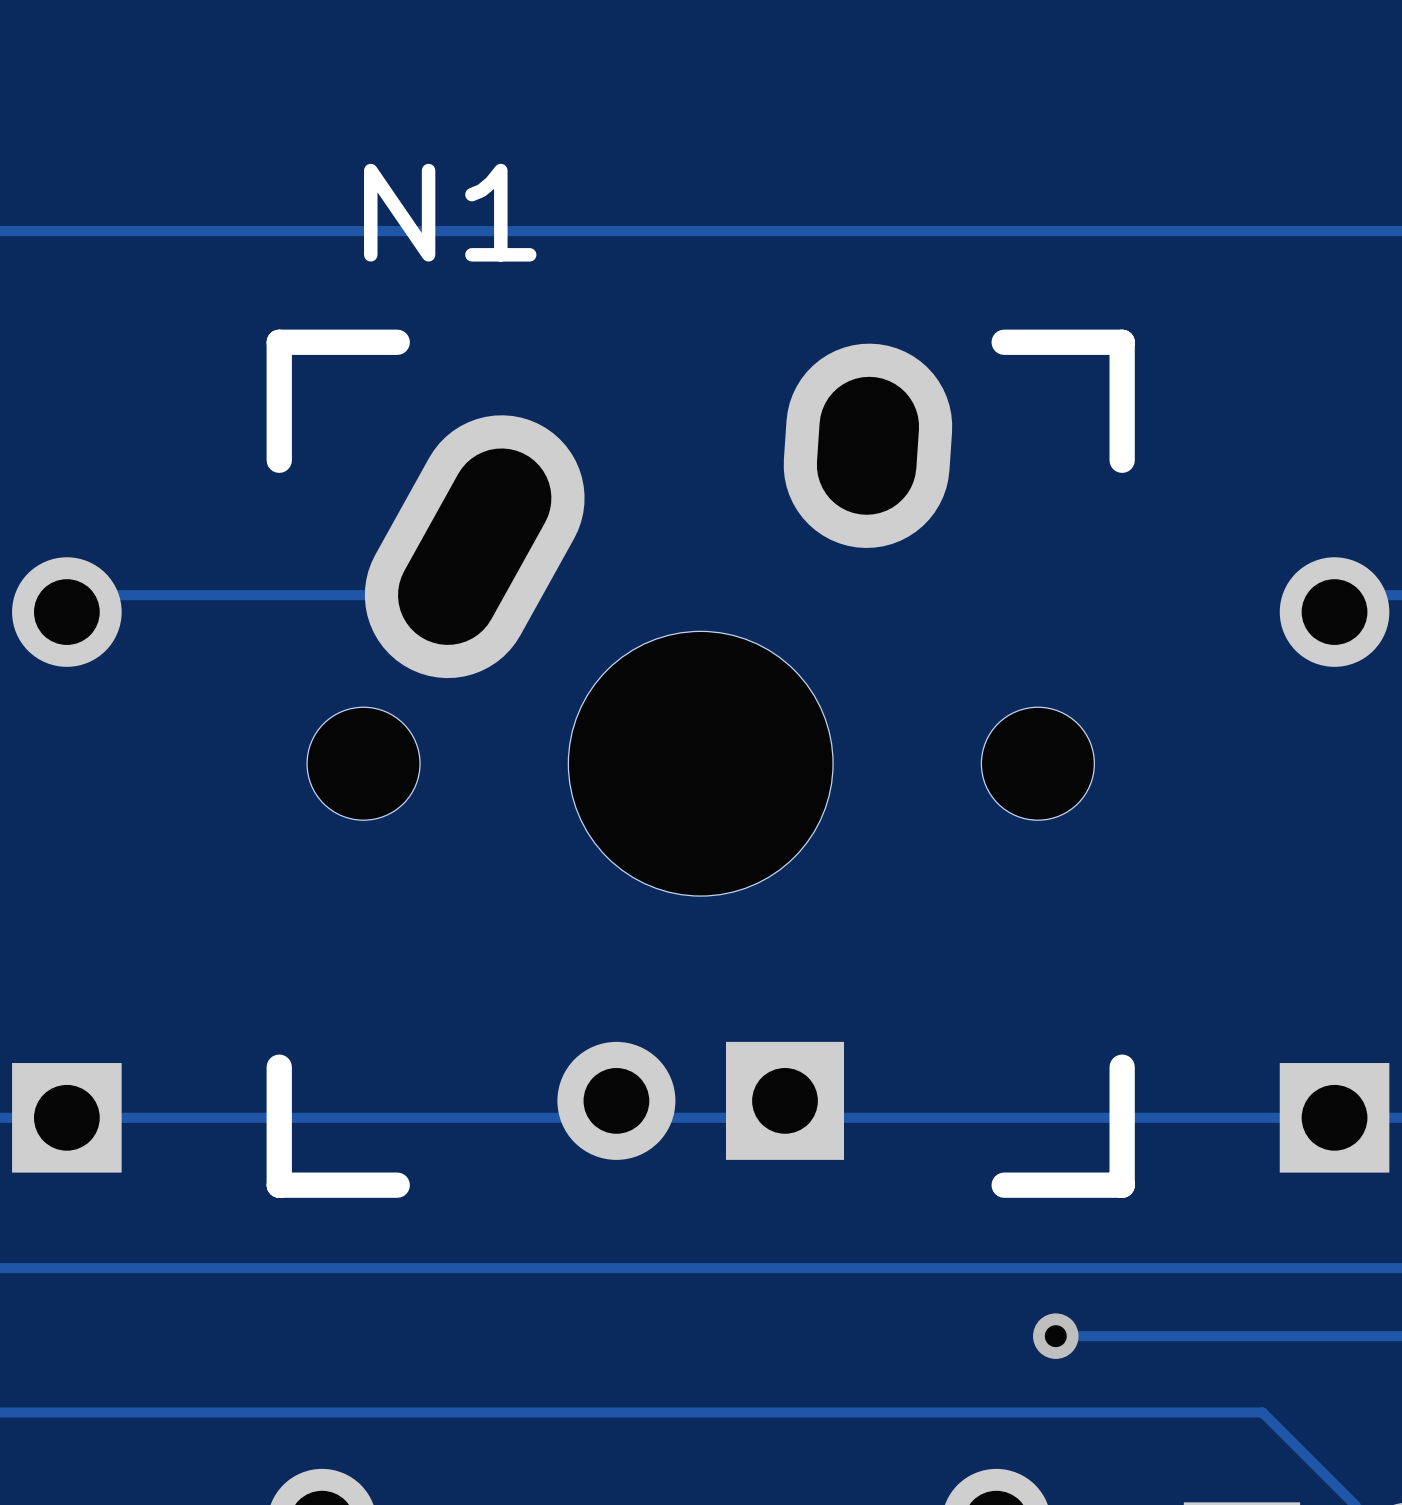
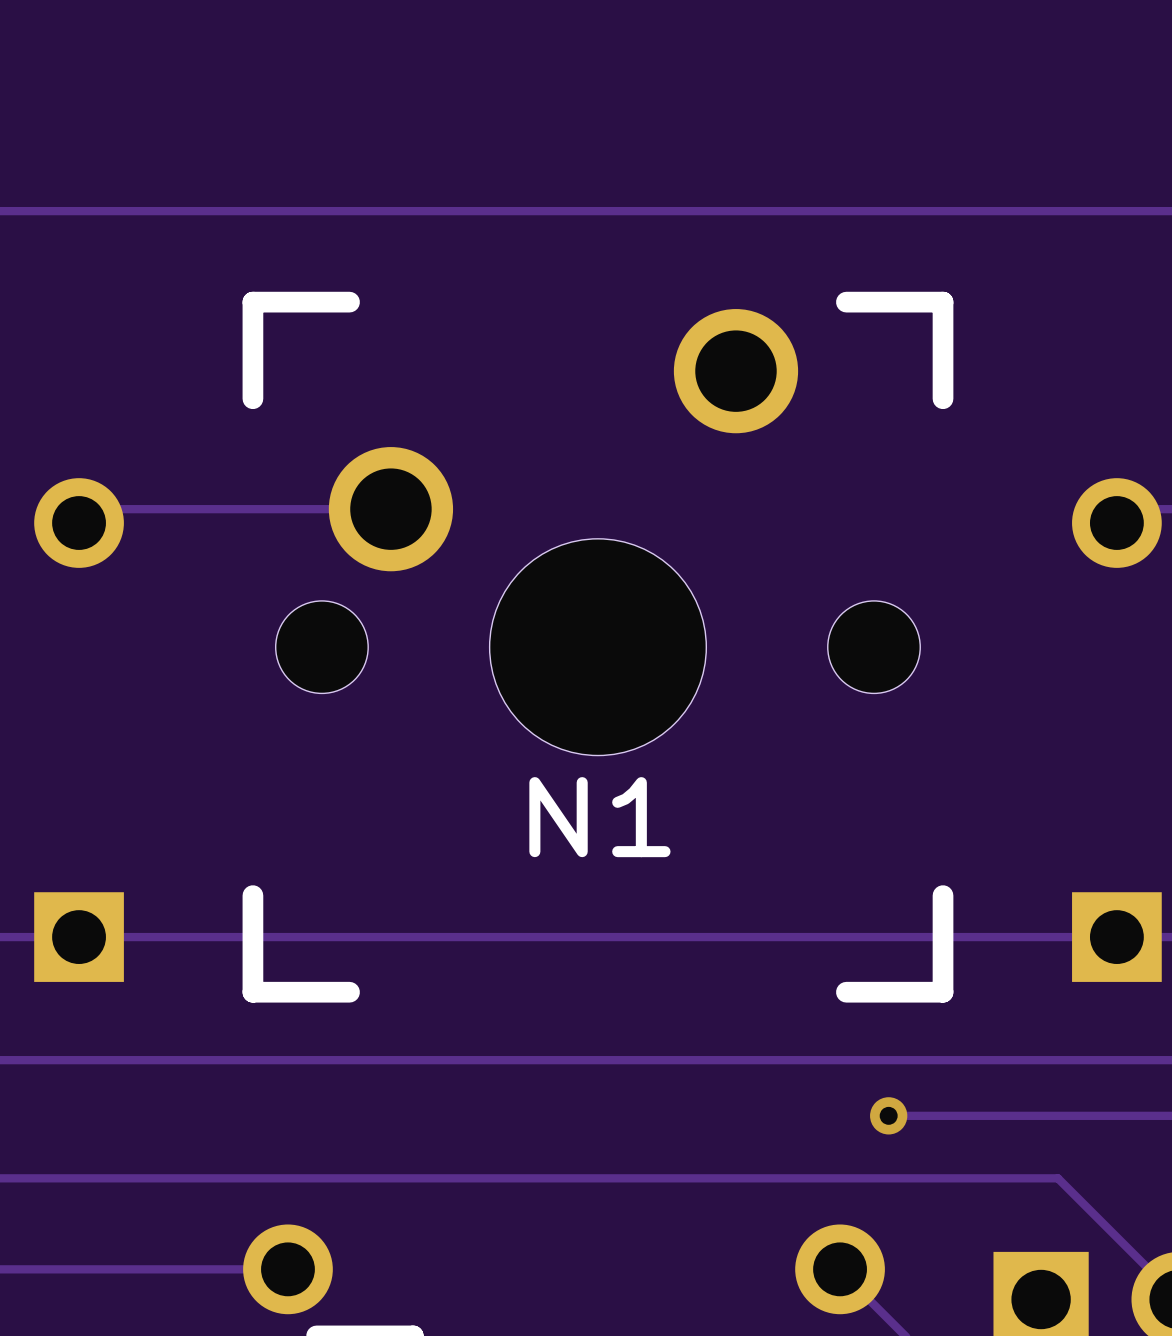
N1 name position: N1 (450, 212) -> N1 (599, 817)
N1 footprint: [266, 329, 1135, 1198] -> [242, 291, 954, 1003]

